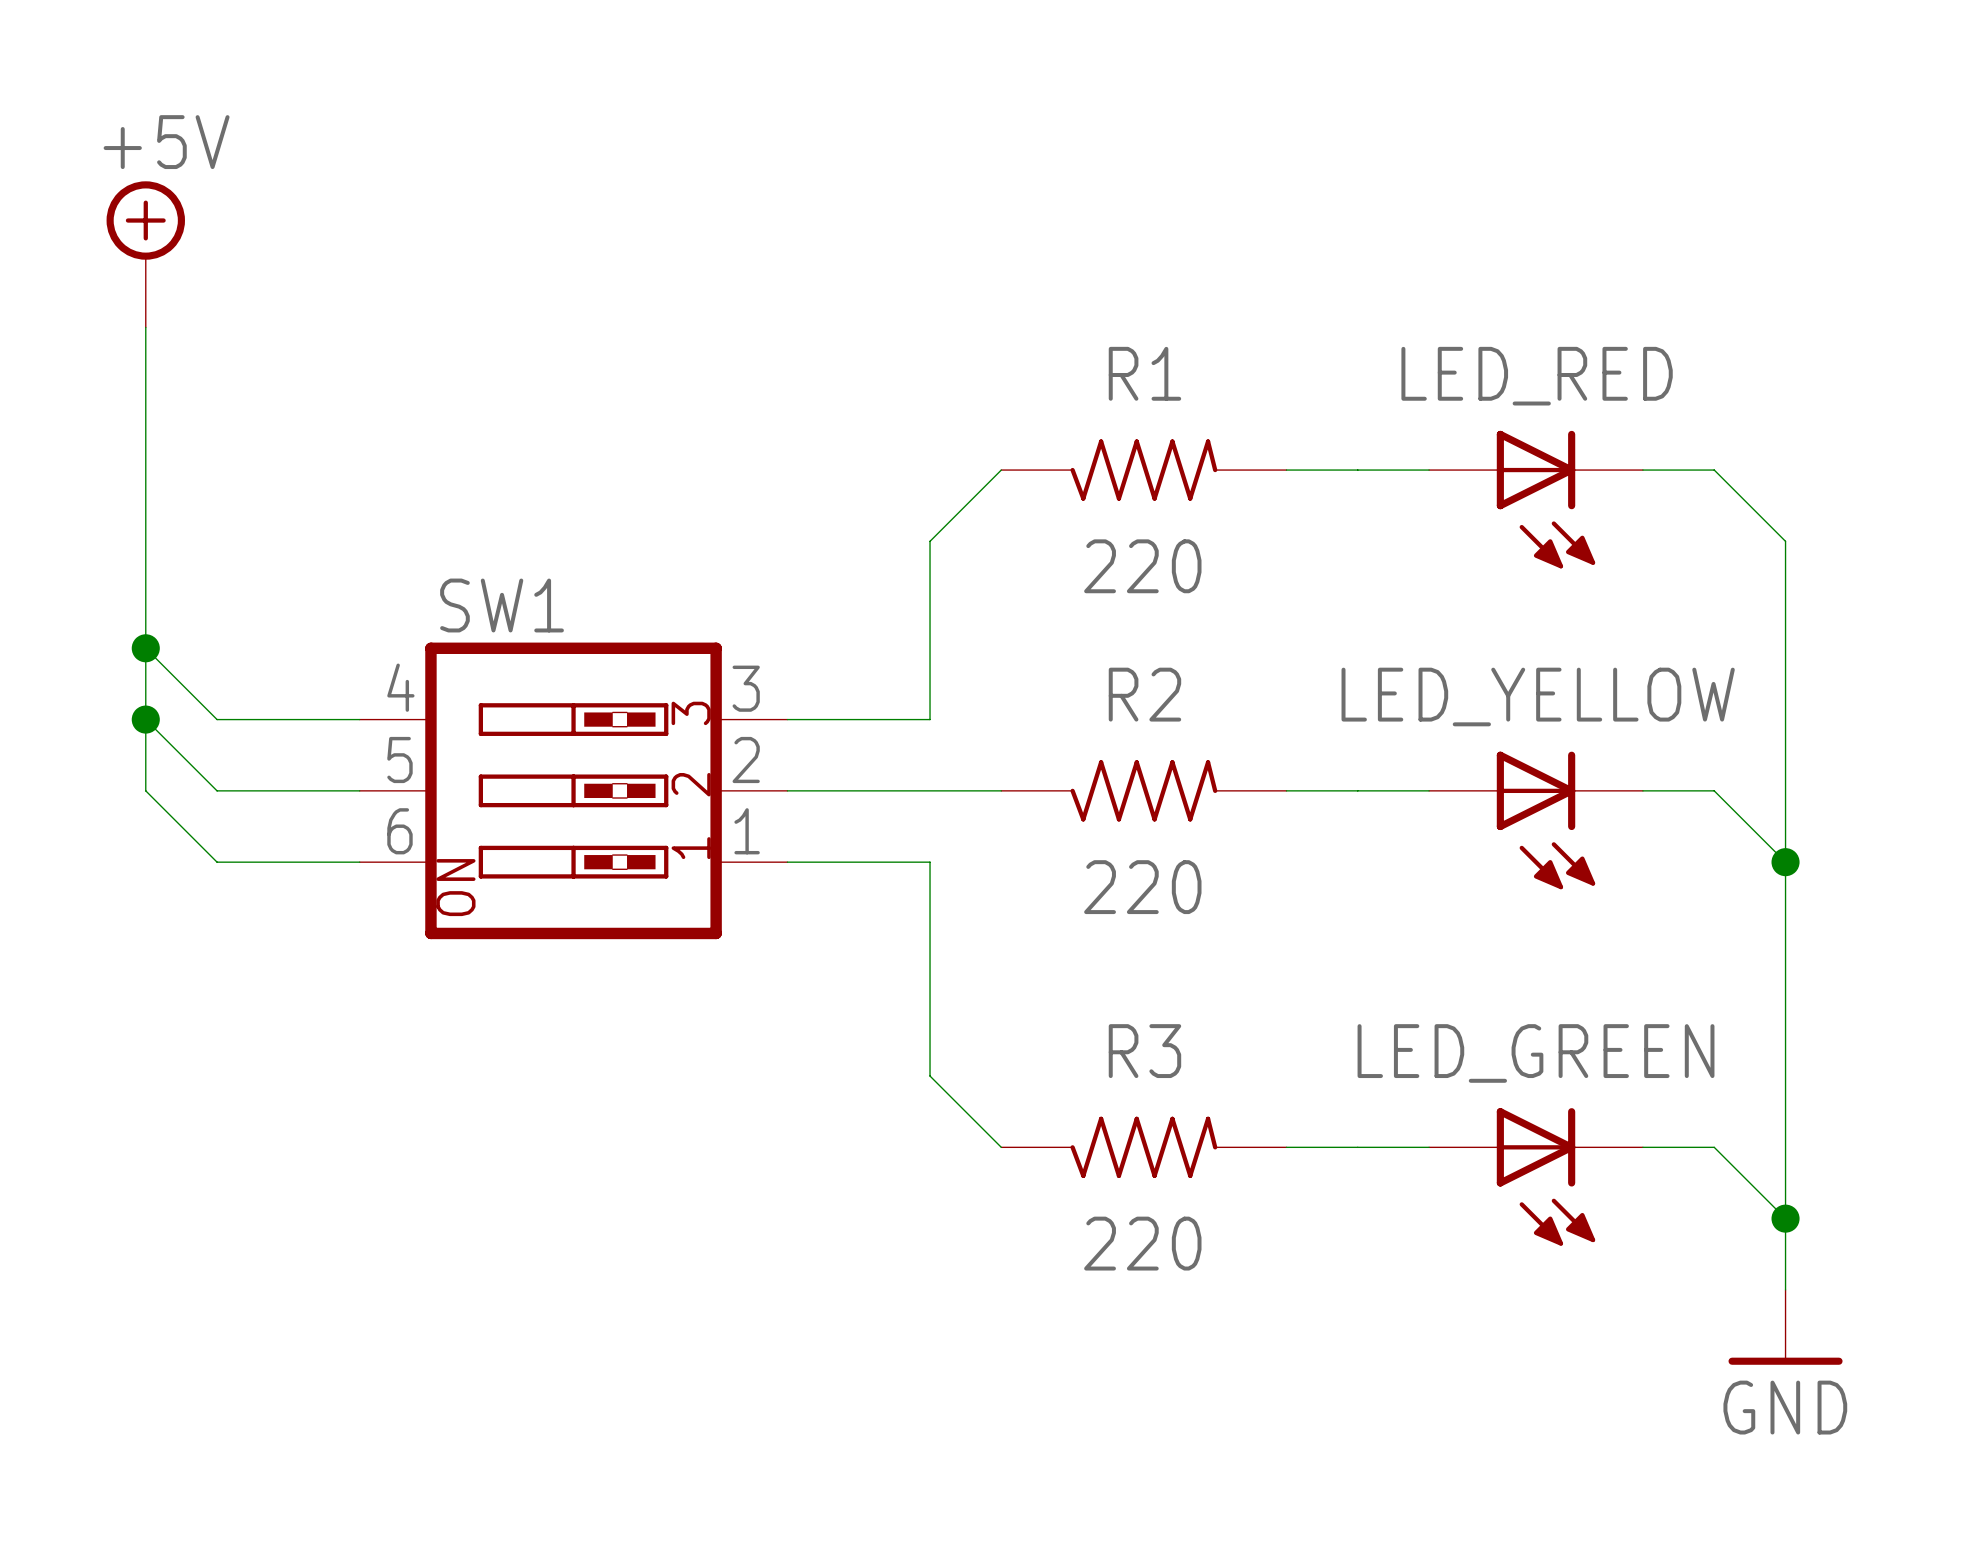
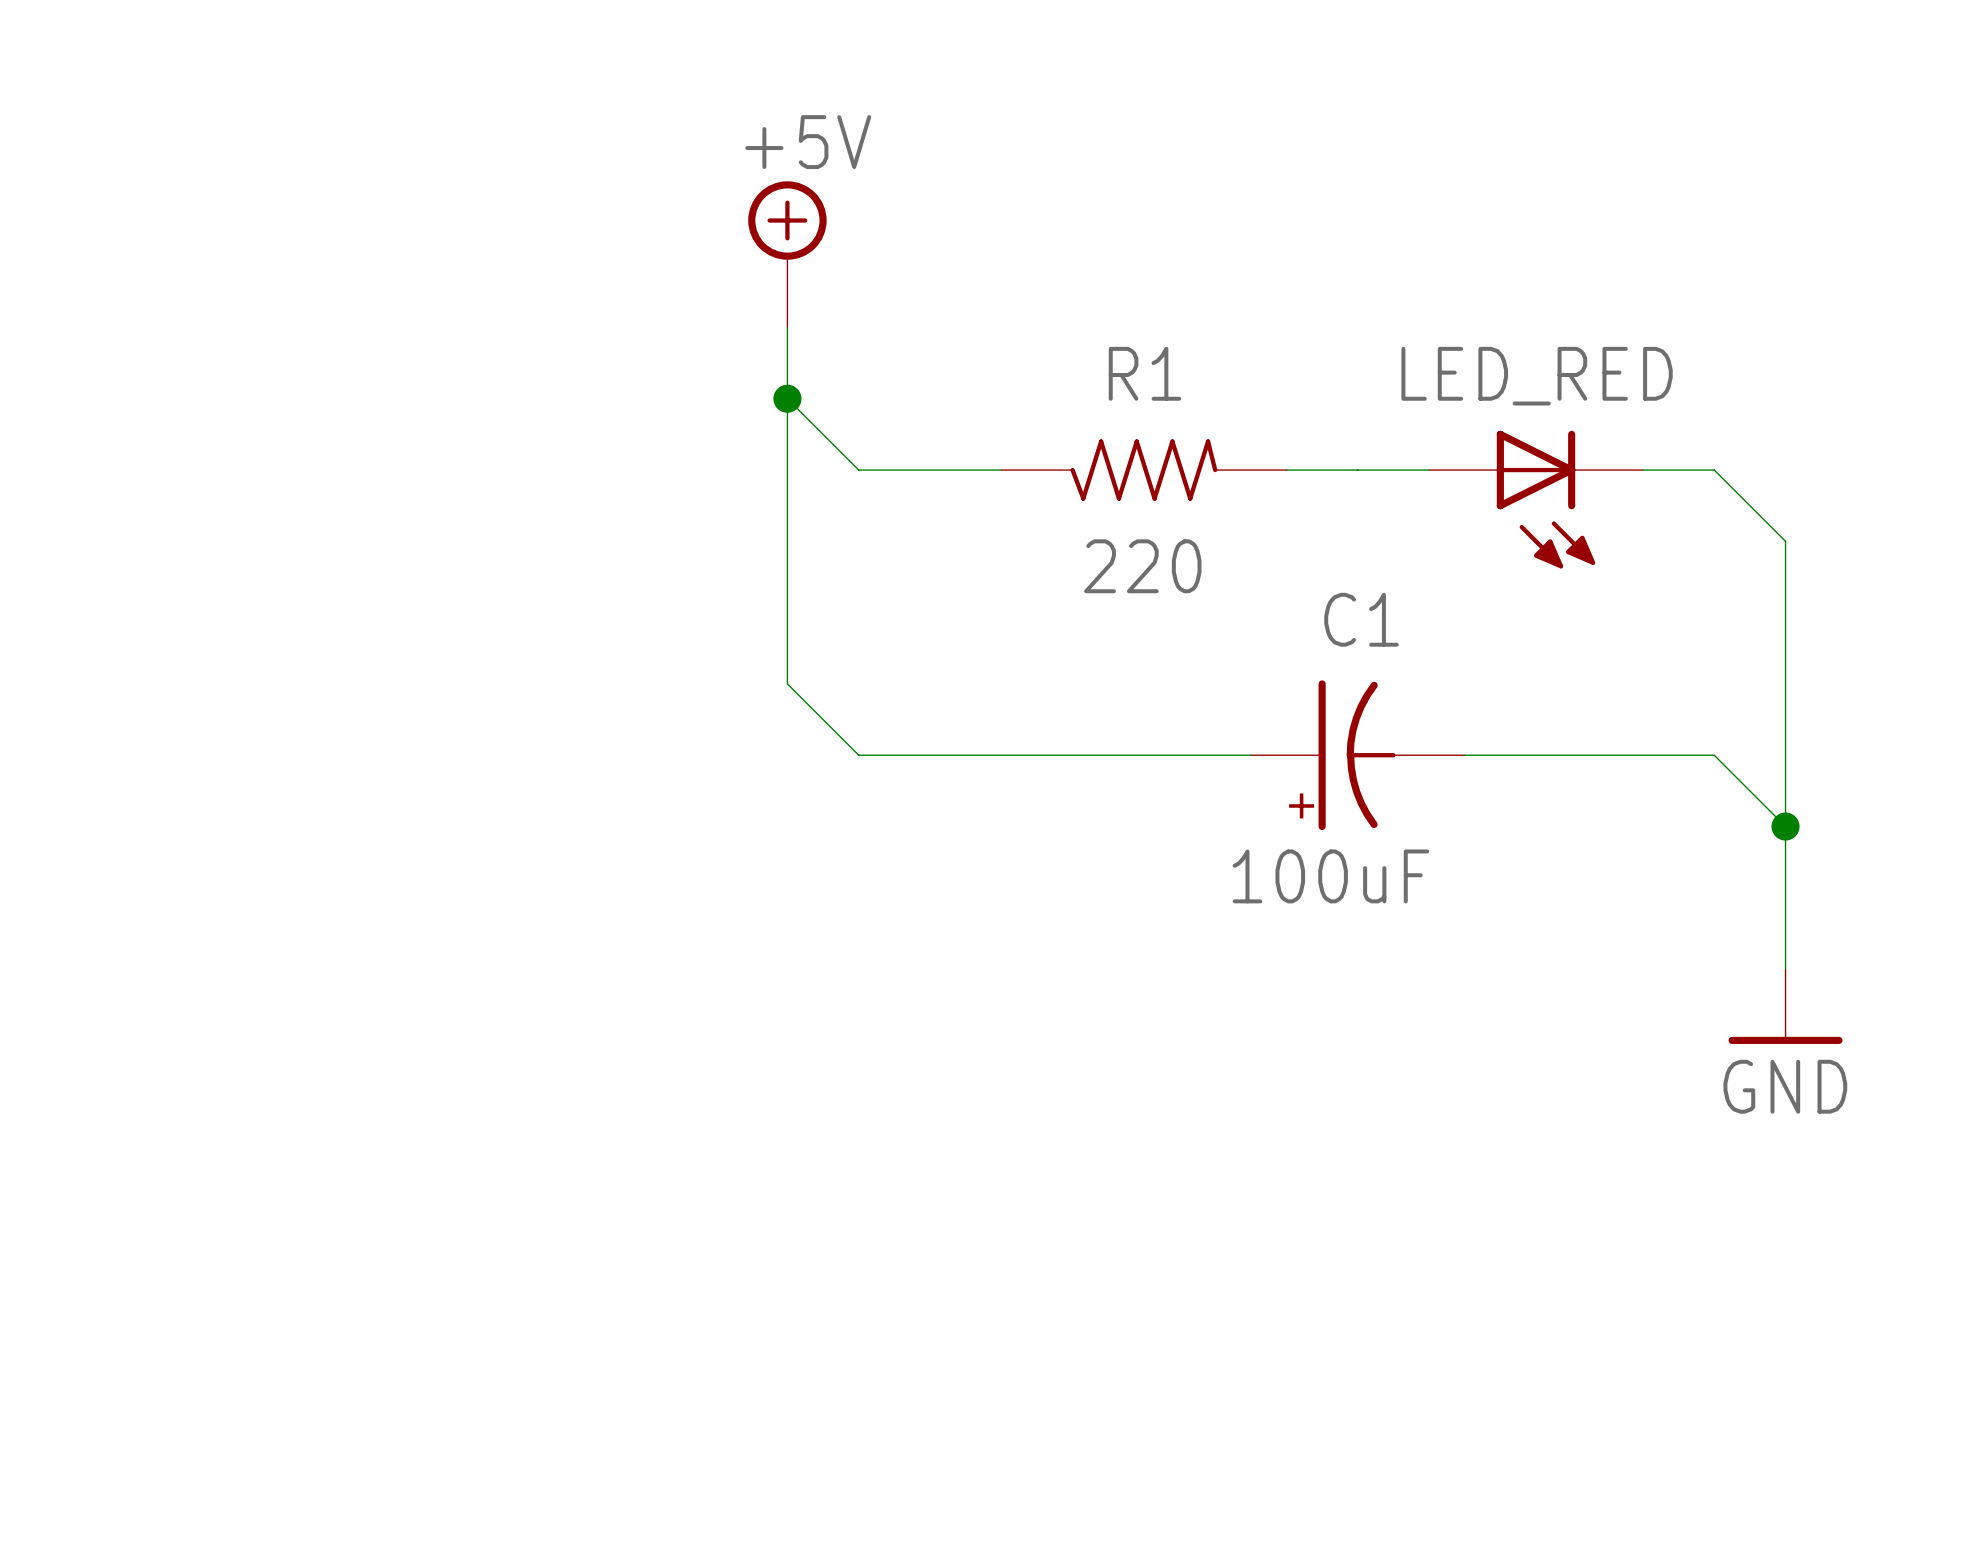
power symbol position: +5V (145, 254) -> +5V (787, 254)
wire: (145, 327) (145, 790) (217, 862) (359, 862) -> none
wire: none -> (787, 327) (787, 683) (858, 755) (1250, 755)
junction: none -> (787, 398)
wire: (1001, 470) (930, 541) (930, 719) (787, 719) -> (1001, 470) (858, 470) (787, 398)
wire: (145, 648) (217, 719) (359, 719) -> none
junction: (145, 648) -> none
wire: (145, 719) (217, 790) (359, 790) -> none
junction: (145, 719) -> none
C1: none -> 100uF (1357, 755)
wire: none -> (1464, 755) (1714, 755) (1785, 826)
SW1: (573, 790) -> none
wire: (787, 790) (1001, 790) -> none
R2: 220 (1143, 790) -> none
wire: (1286, 790) (1429, 790) -> none
wire: (1642, 790) (1714, 790) (1785, 862) -> none
LED_YELLOW: (1536, 820) -> none
wire: (787, 862) (930, 862) (930, 1076) (1001, 1147) -> none
junction position: (1785, 862) -> (1785, 826)
wire: (1785, 969) (1785, 1289) -> none
R3: 220 (1143, 1147) -> none
wire: (1286, 1147) (1429, 1147) -> none
wire: (1642, 1147) (1714, 1147) (1785, 1218) -> none
LED_GREEN: (1536, 1176) -> none
junction: (1785, 1218) -> none
power symbol position: GND (1785, 1327) -> GND (1785, 1006)

